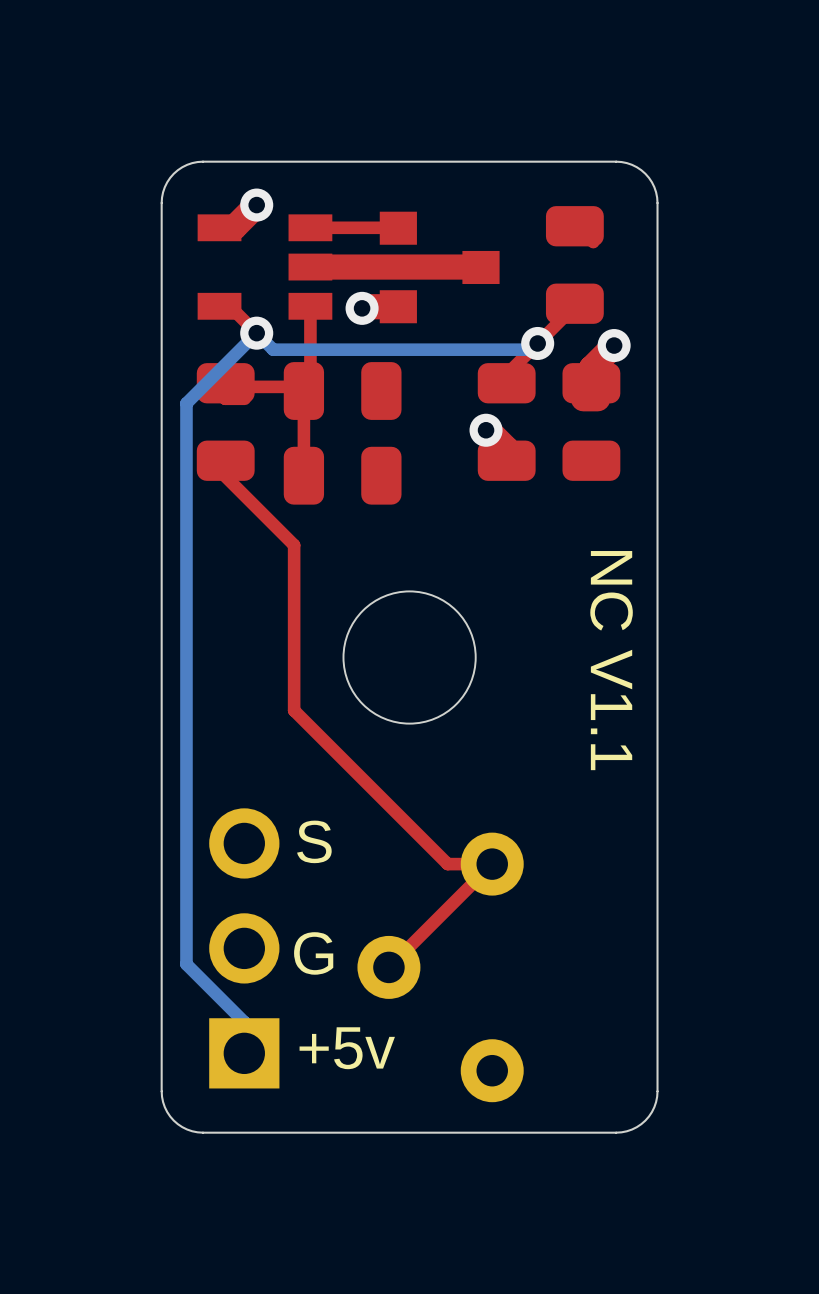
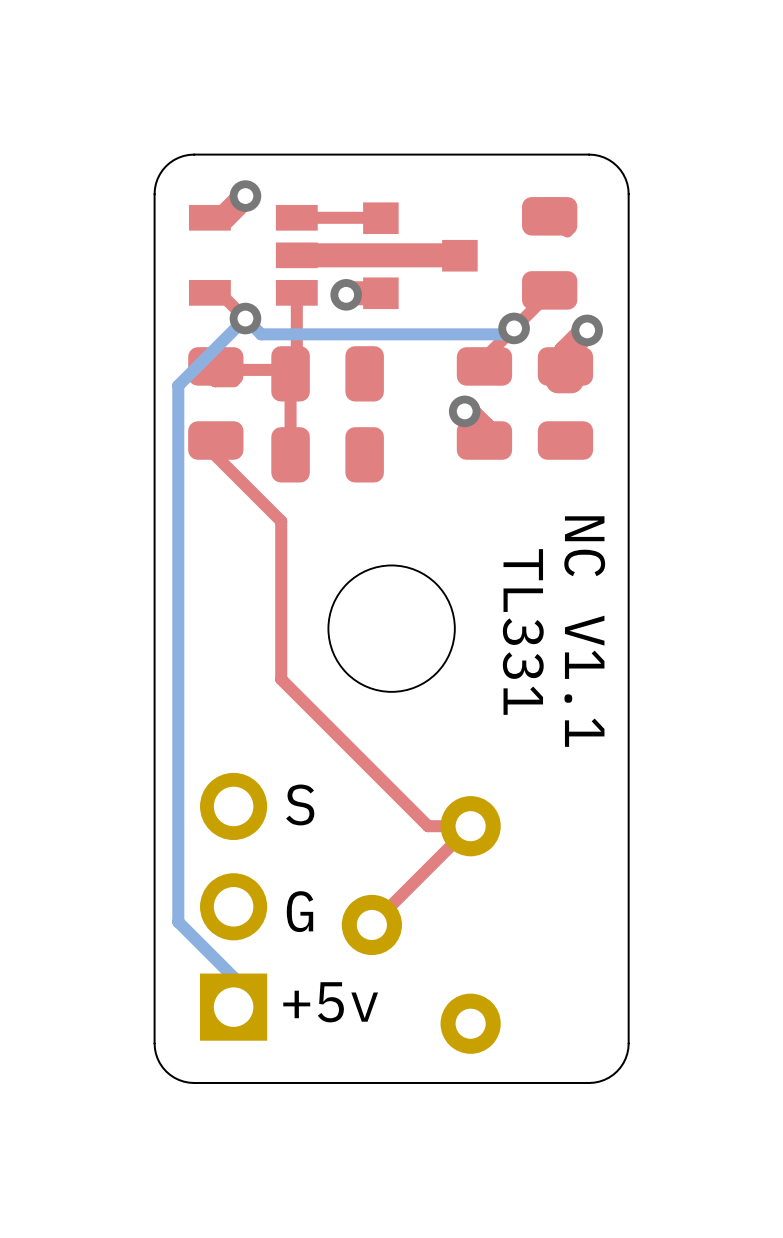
text: none -> TL331 (523, 631)

